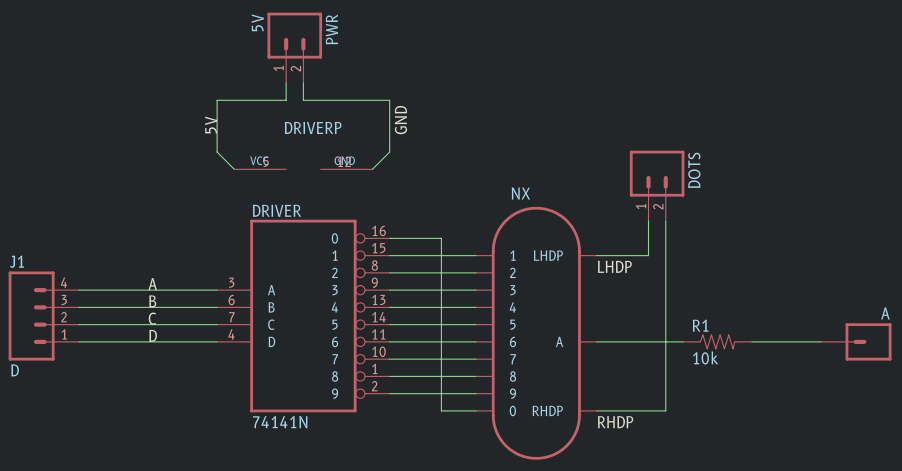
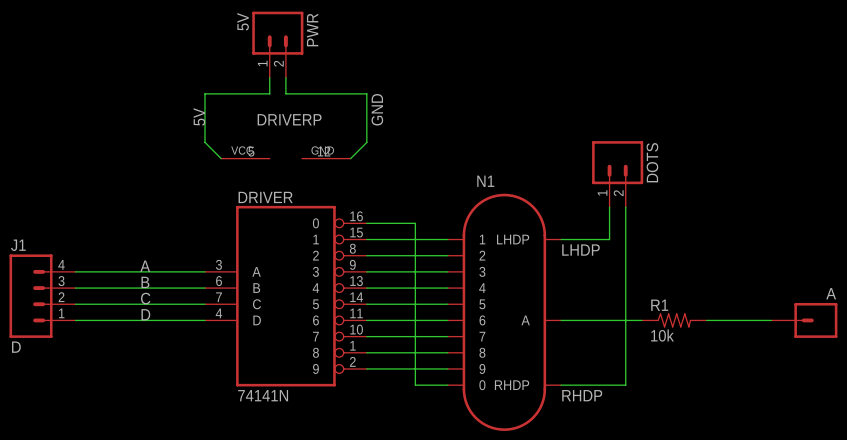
NX name: NX (520, 193) -> N1 (485, 181)

